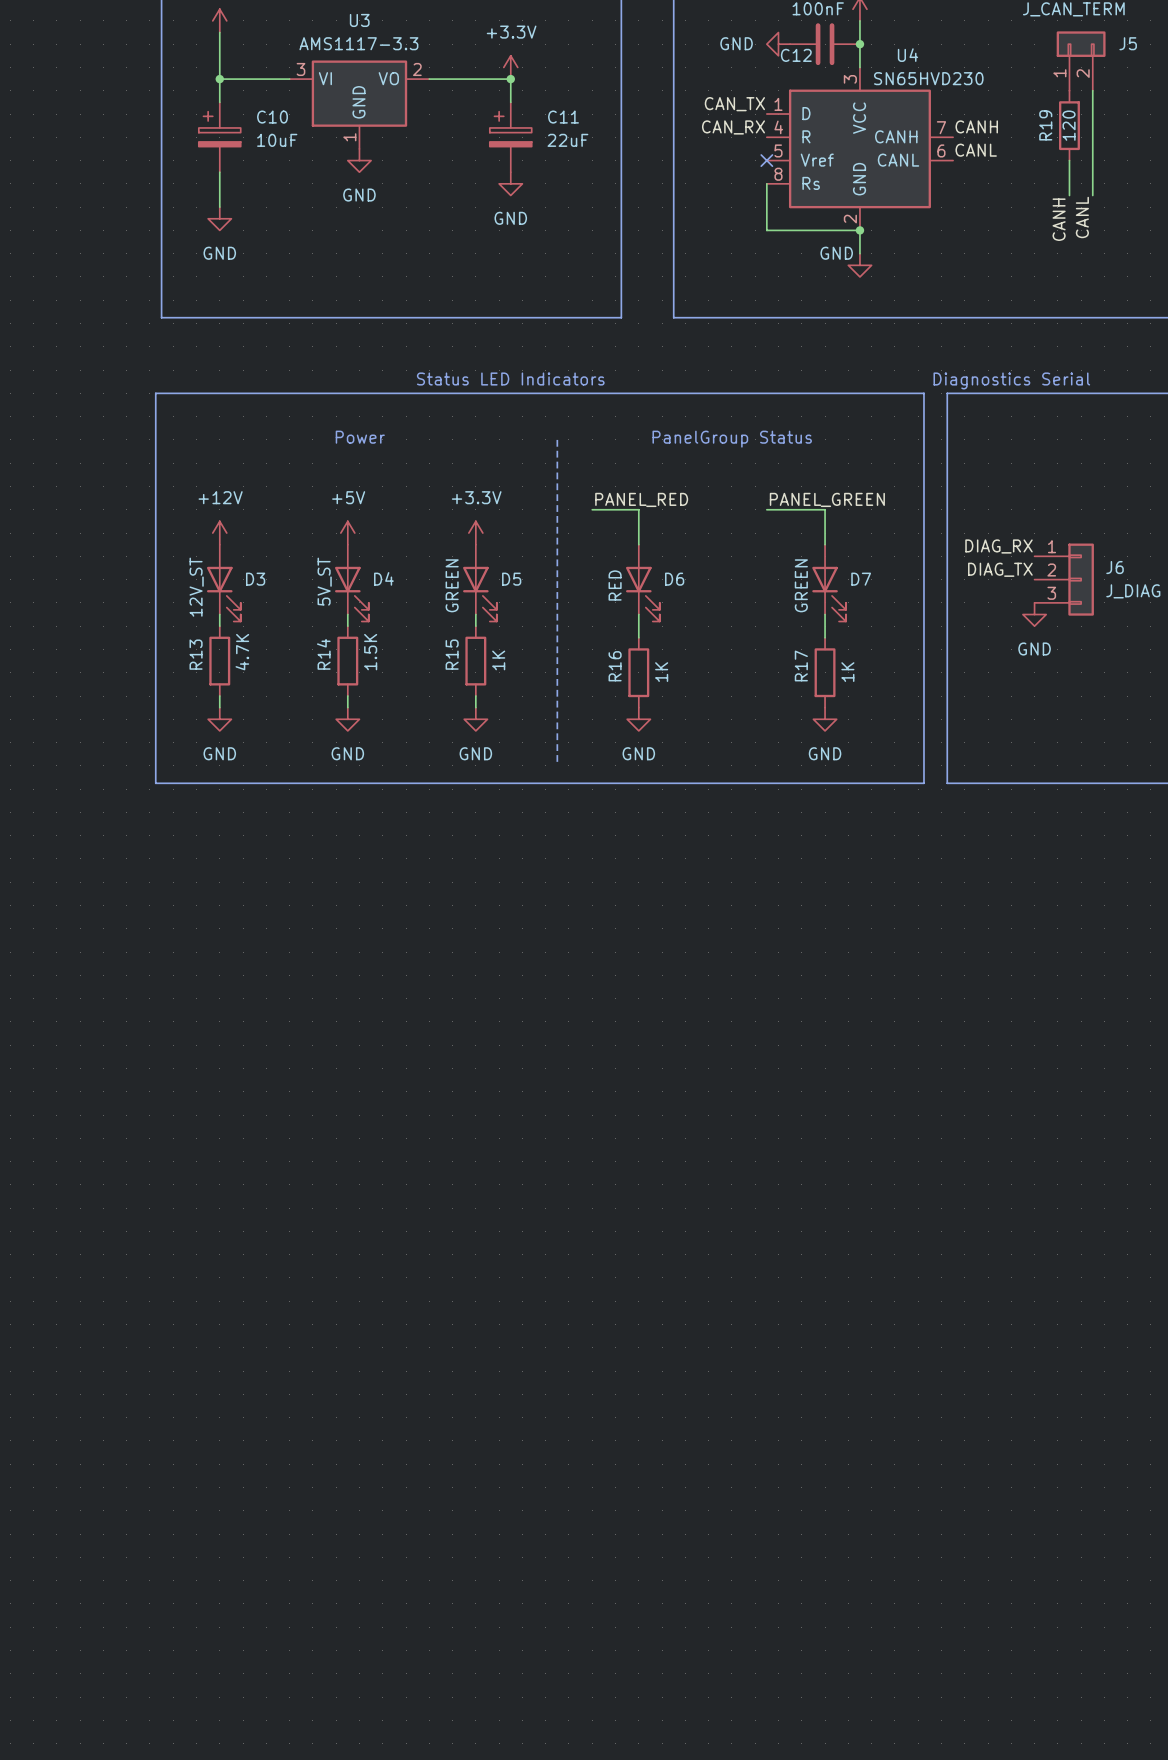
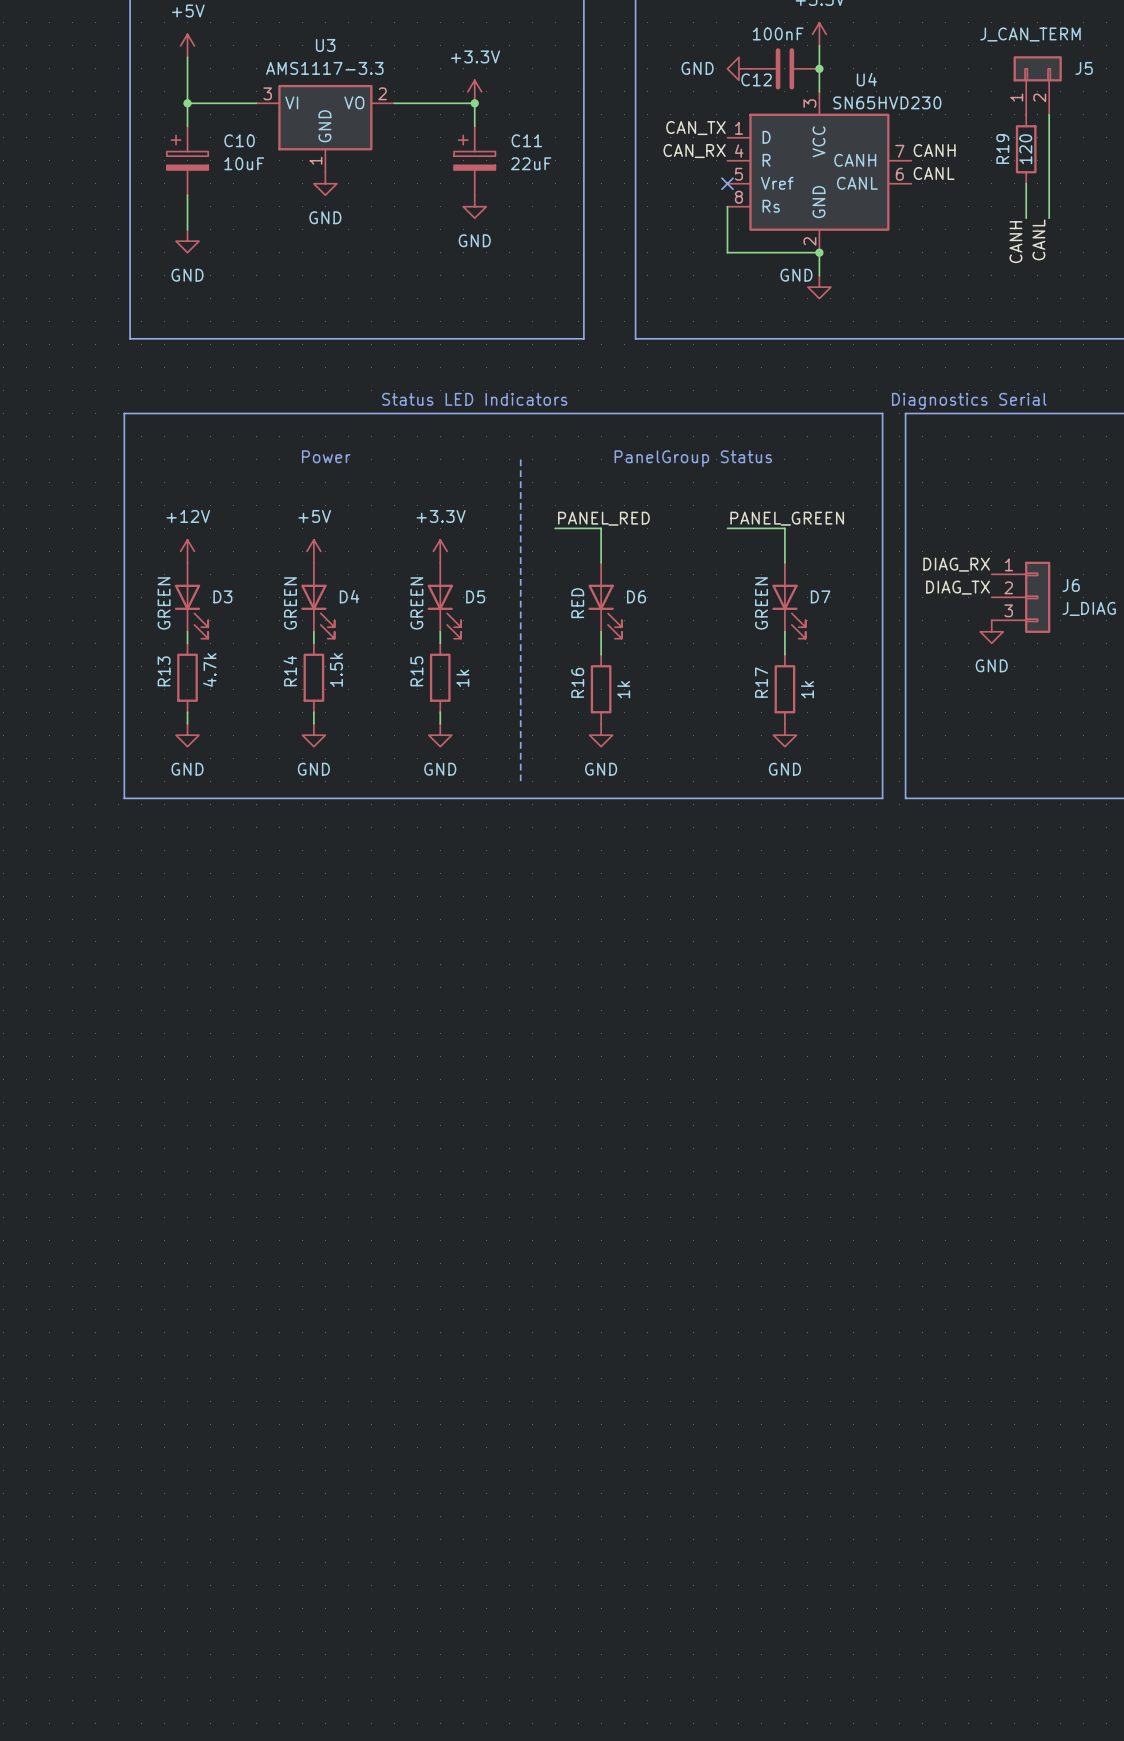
D4 value: 5V_ST (324, 581) -> GREEN (290, 603)
D3 value: 12V_ST (196, 587) -> GREEN (164, 603)
R13 value: 4.7K (242, 652) -> 4.7k (209, 670)
R14 value: 1.5K (370, 652) -> 1.5k (336, 670)
R15 value: 1K (498, 660) -> 1k (462, 678)
R16 value: 1K (661, 672) -> 1k (623, 689)
R17 value: 1K (847, 672) -> 1k (807, 689)

